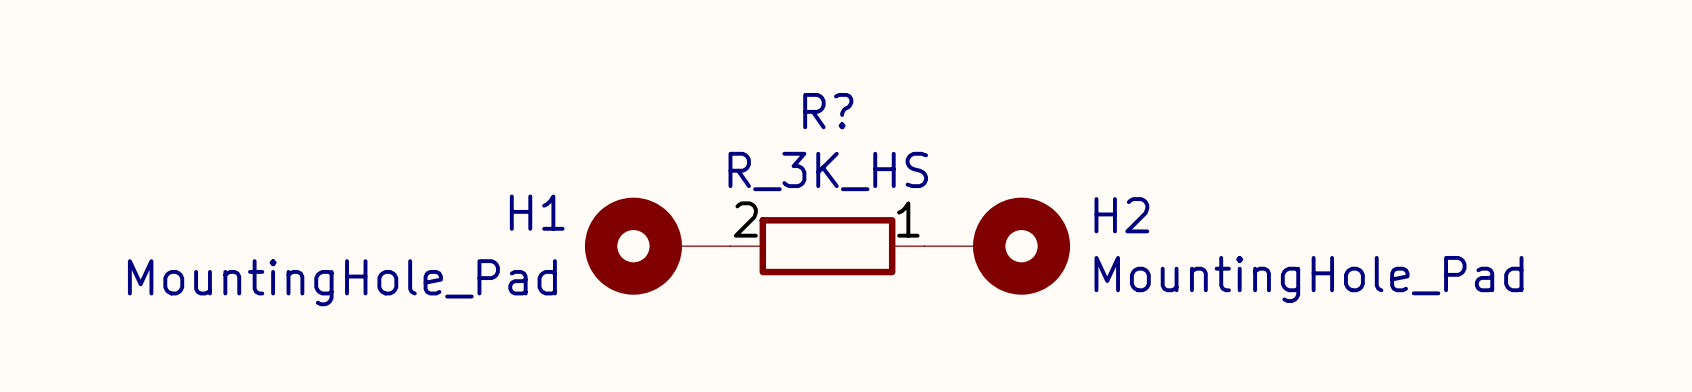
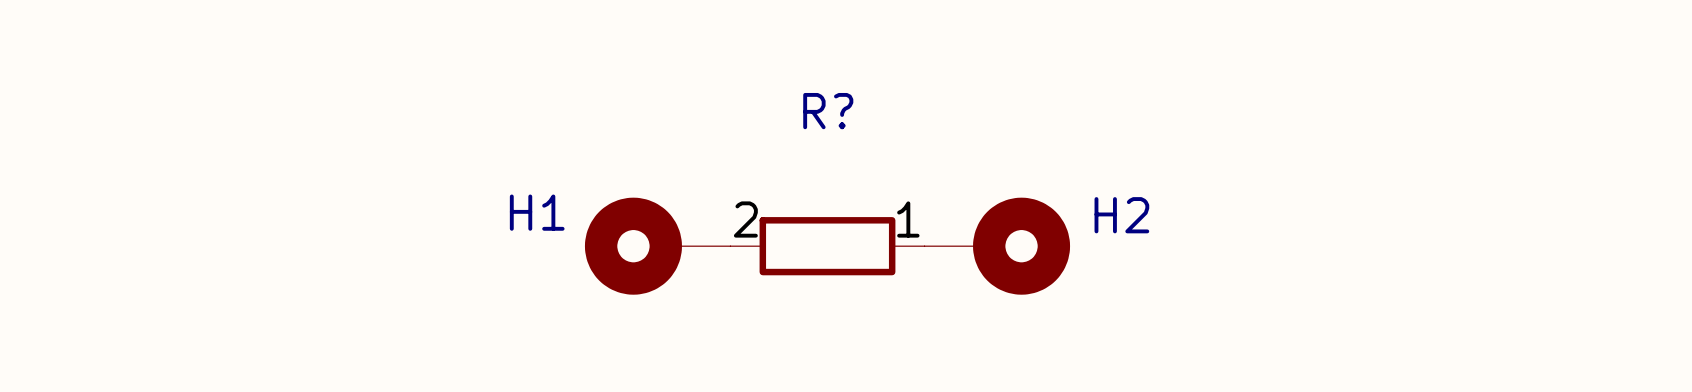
R? value: R_3K_HS (828, 171) -> none
H2 value: MountingHole_Pad (1308, 279) -> none
H1 value: MountingHole_Pad (342, 282) -> none

